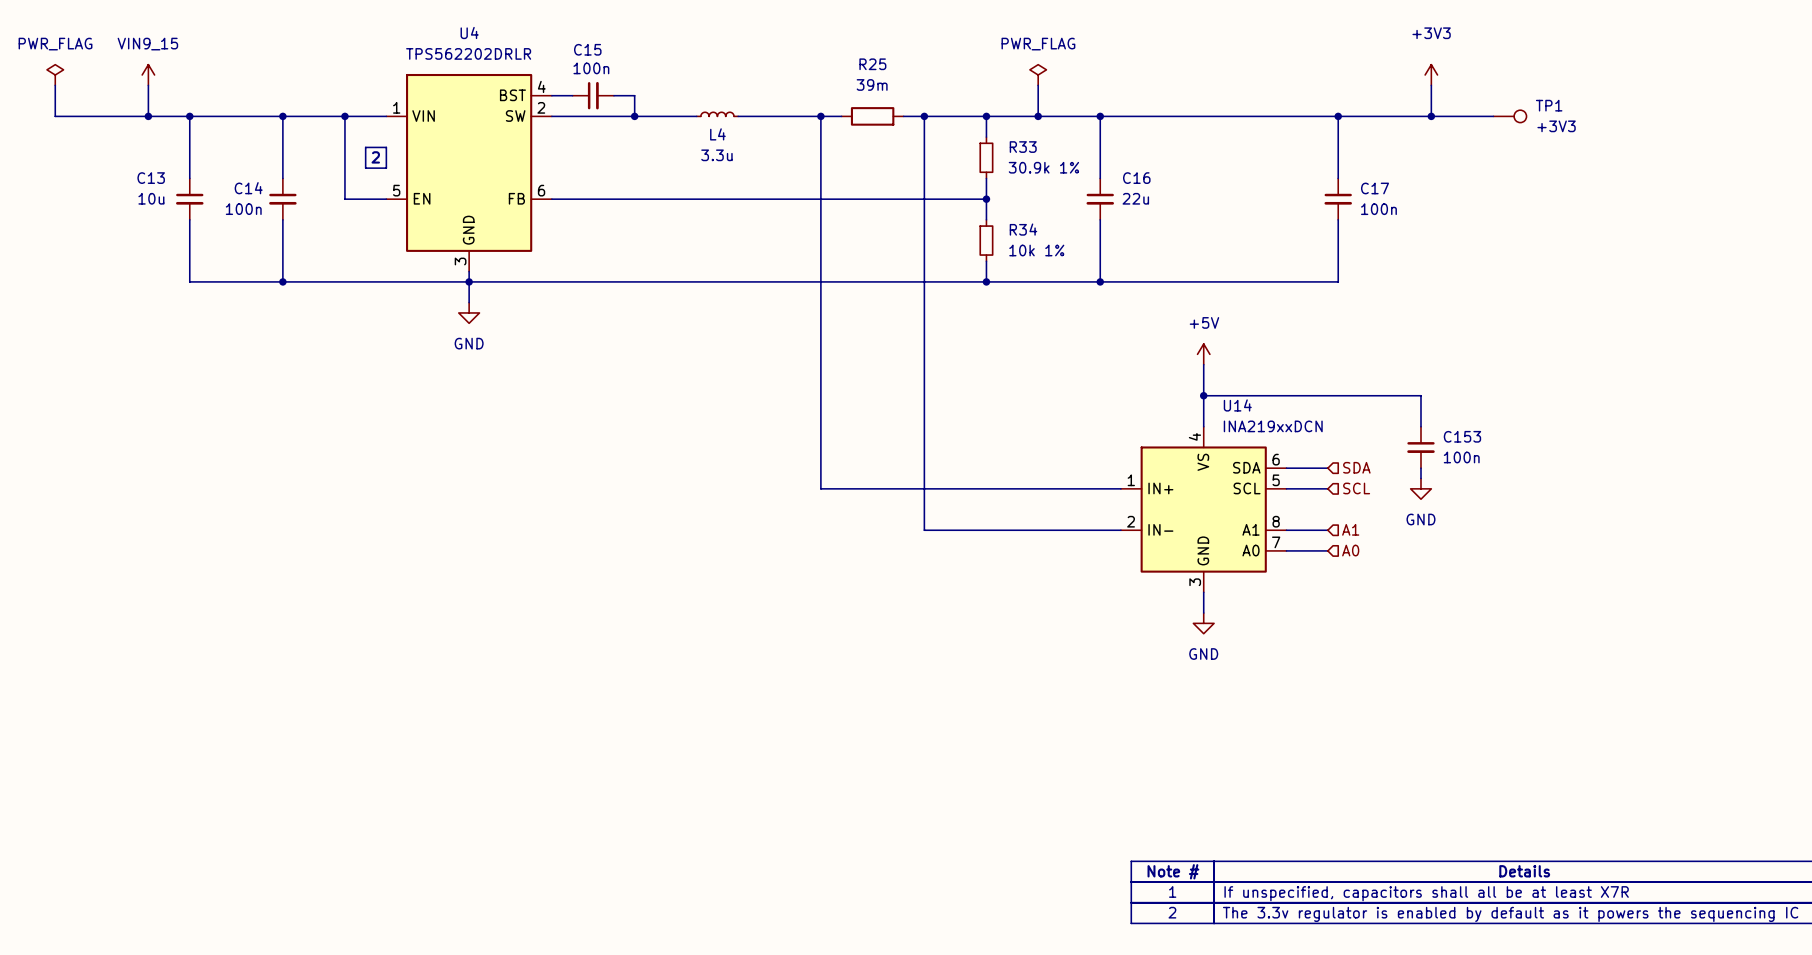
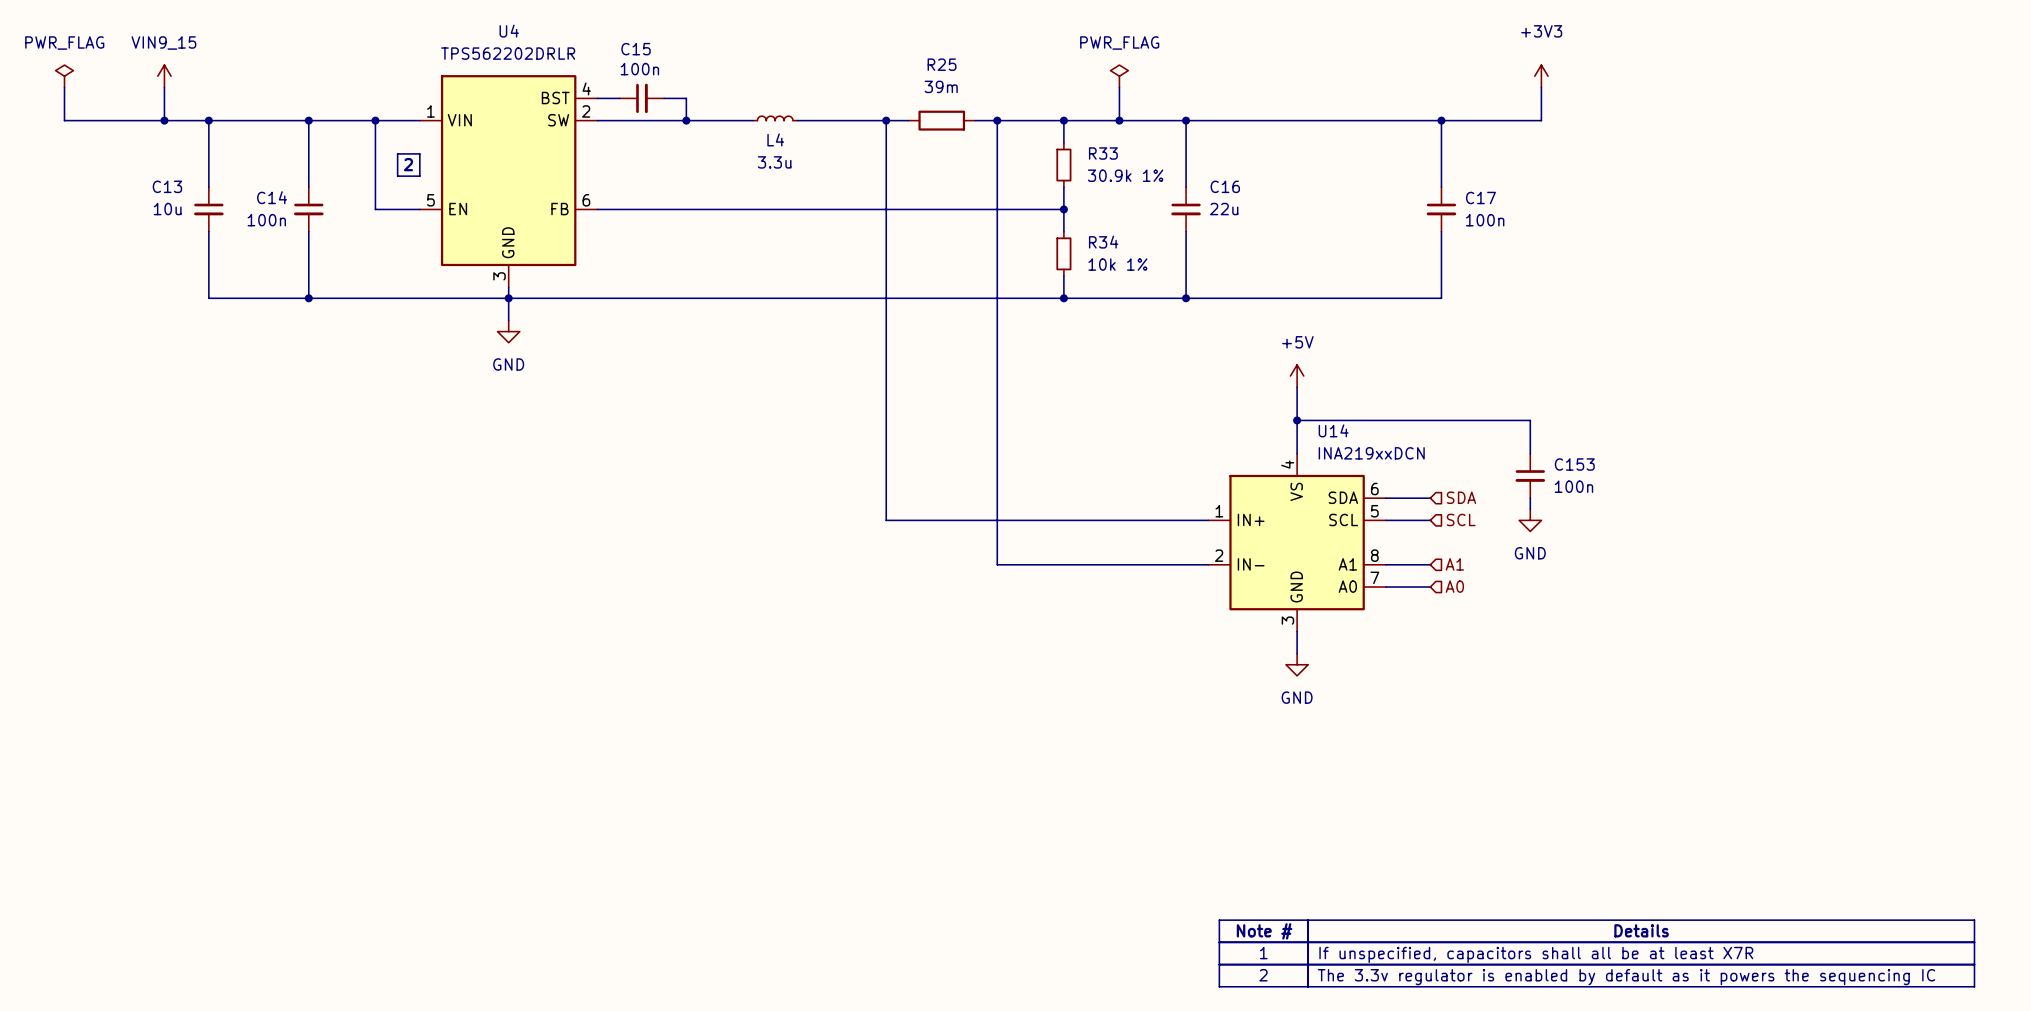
wire: (1431, 116) (1493, 116) -> none
junction: (1431, 116) -> none
TP1: +3V3 (1509, 116) -> none

